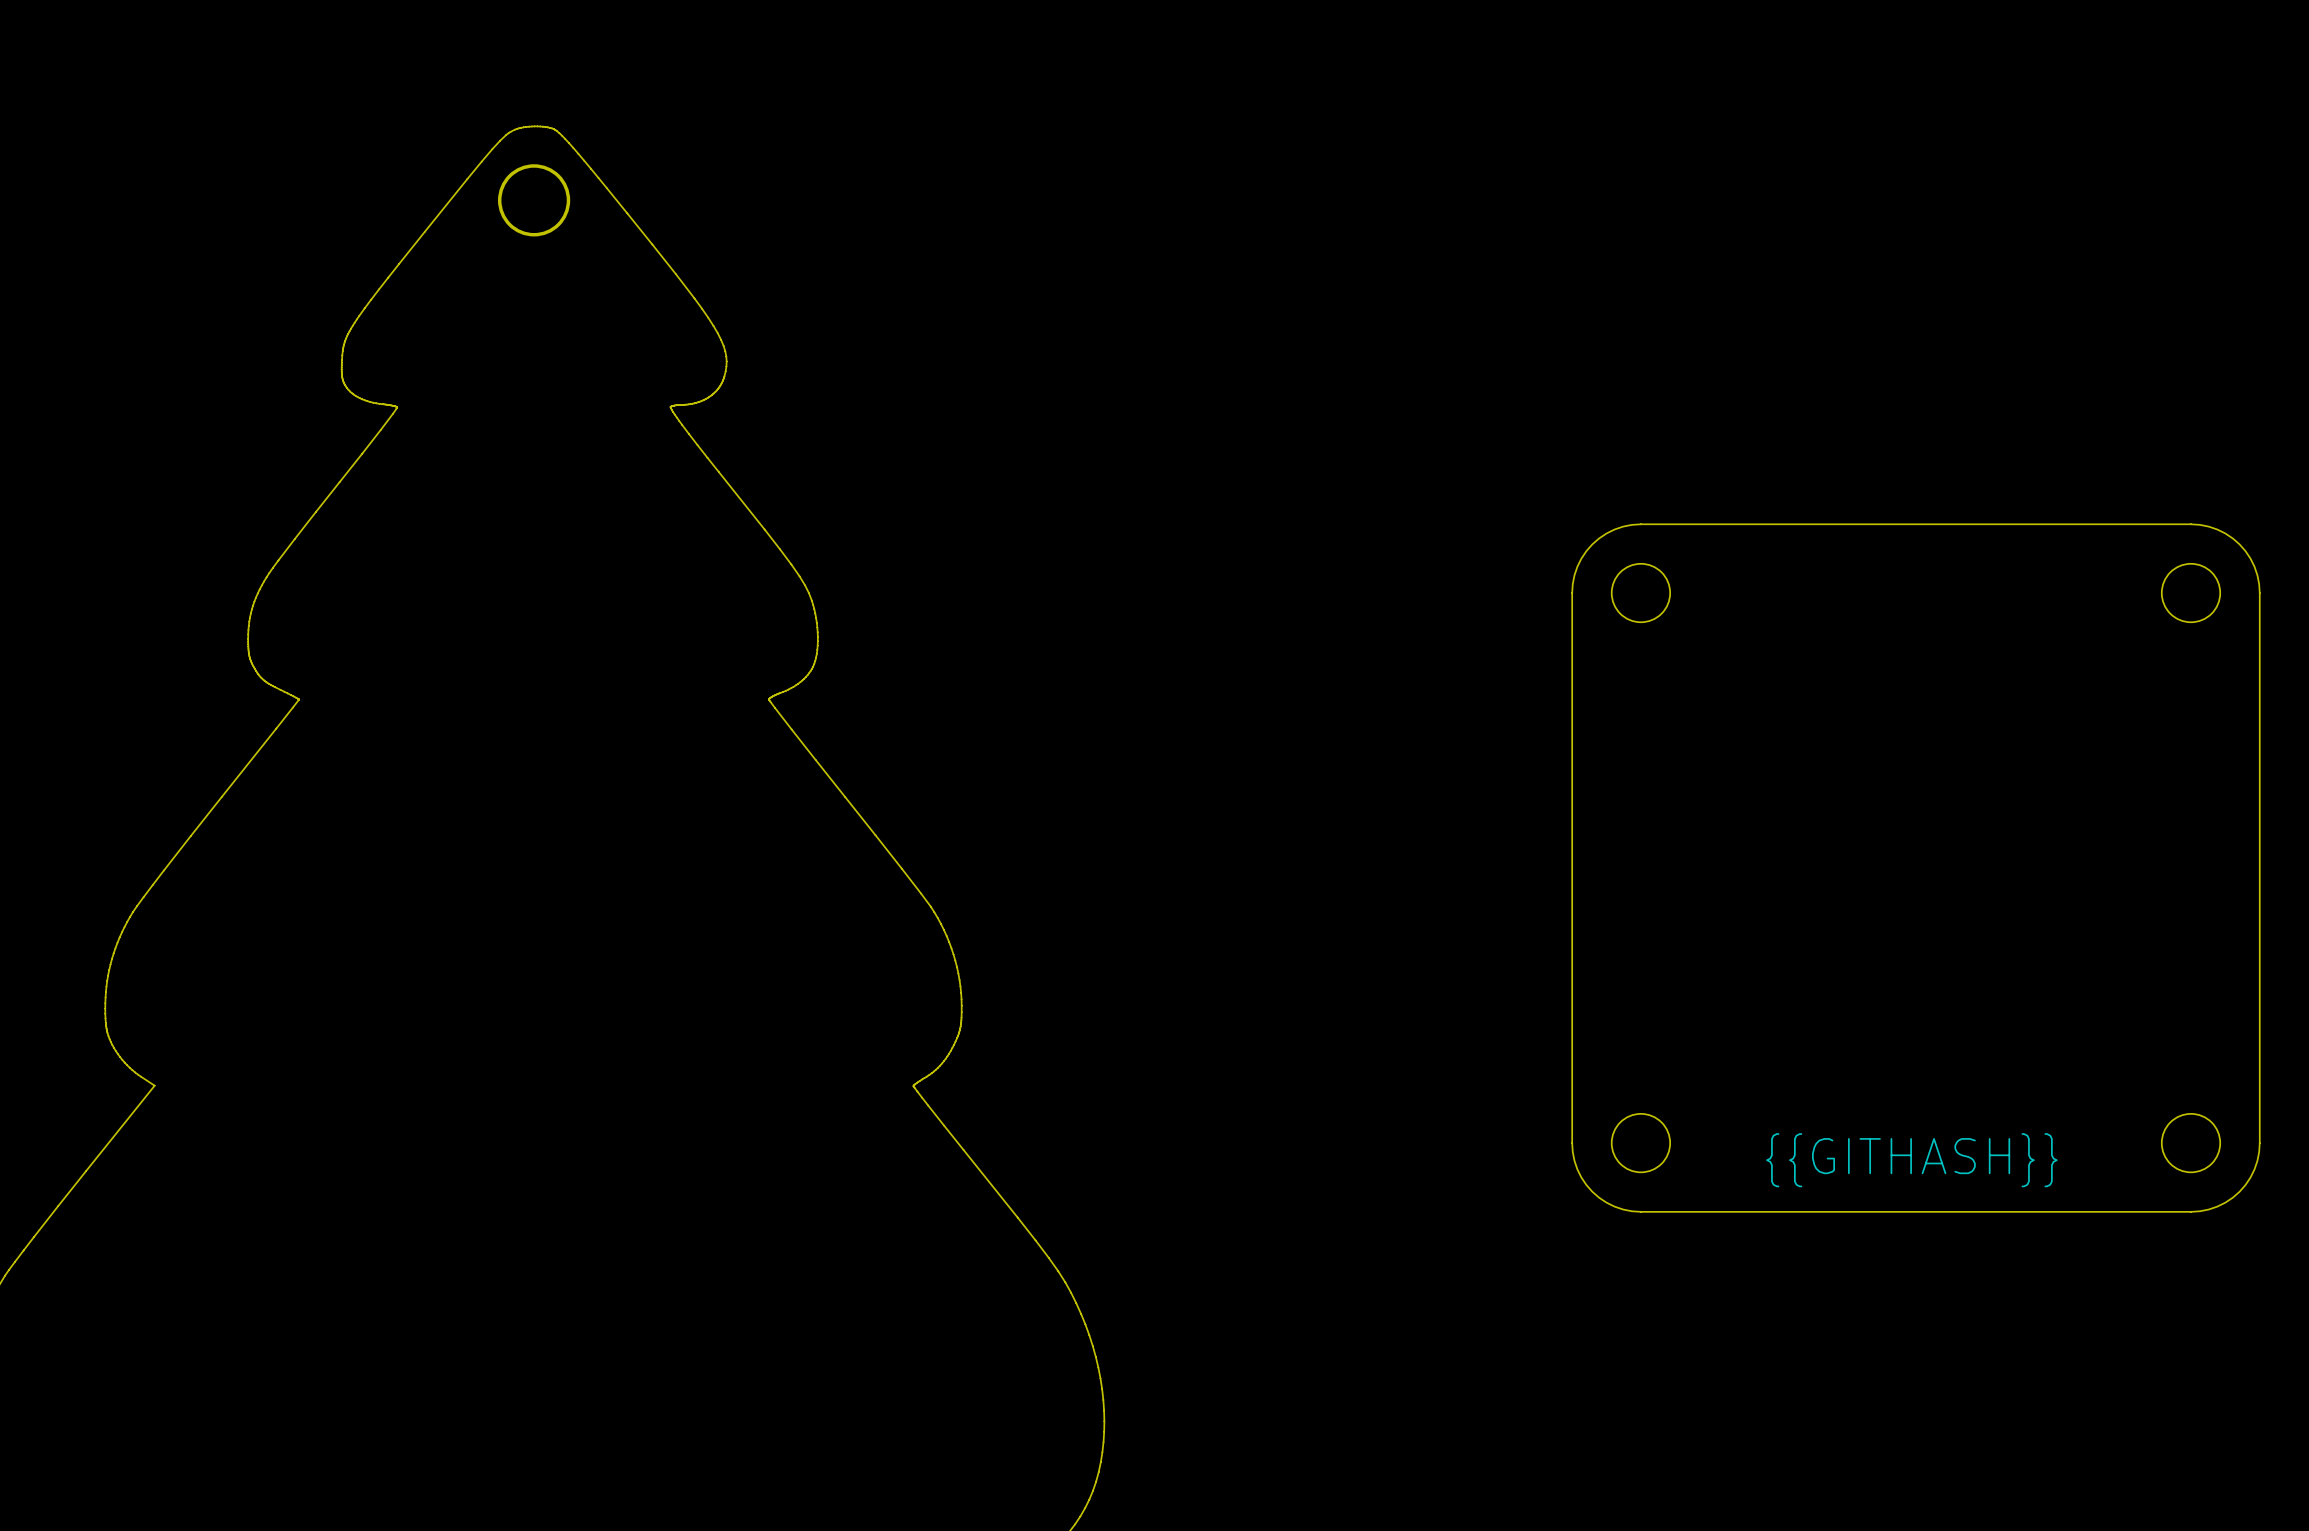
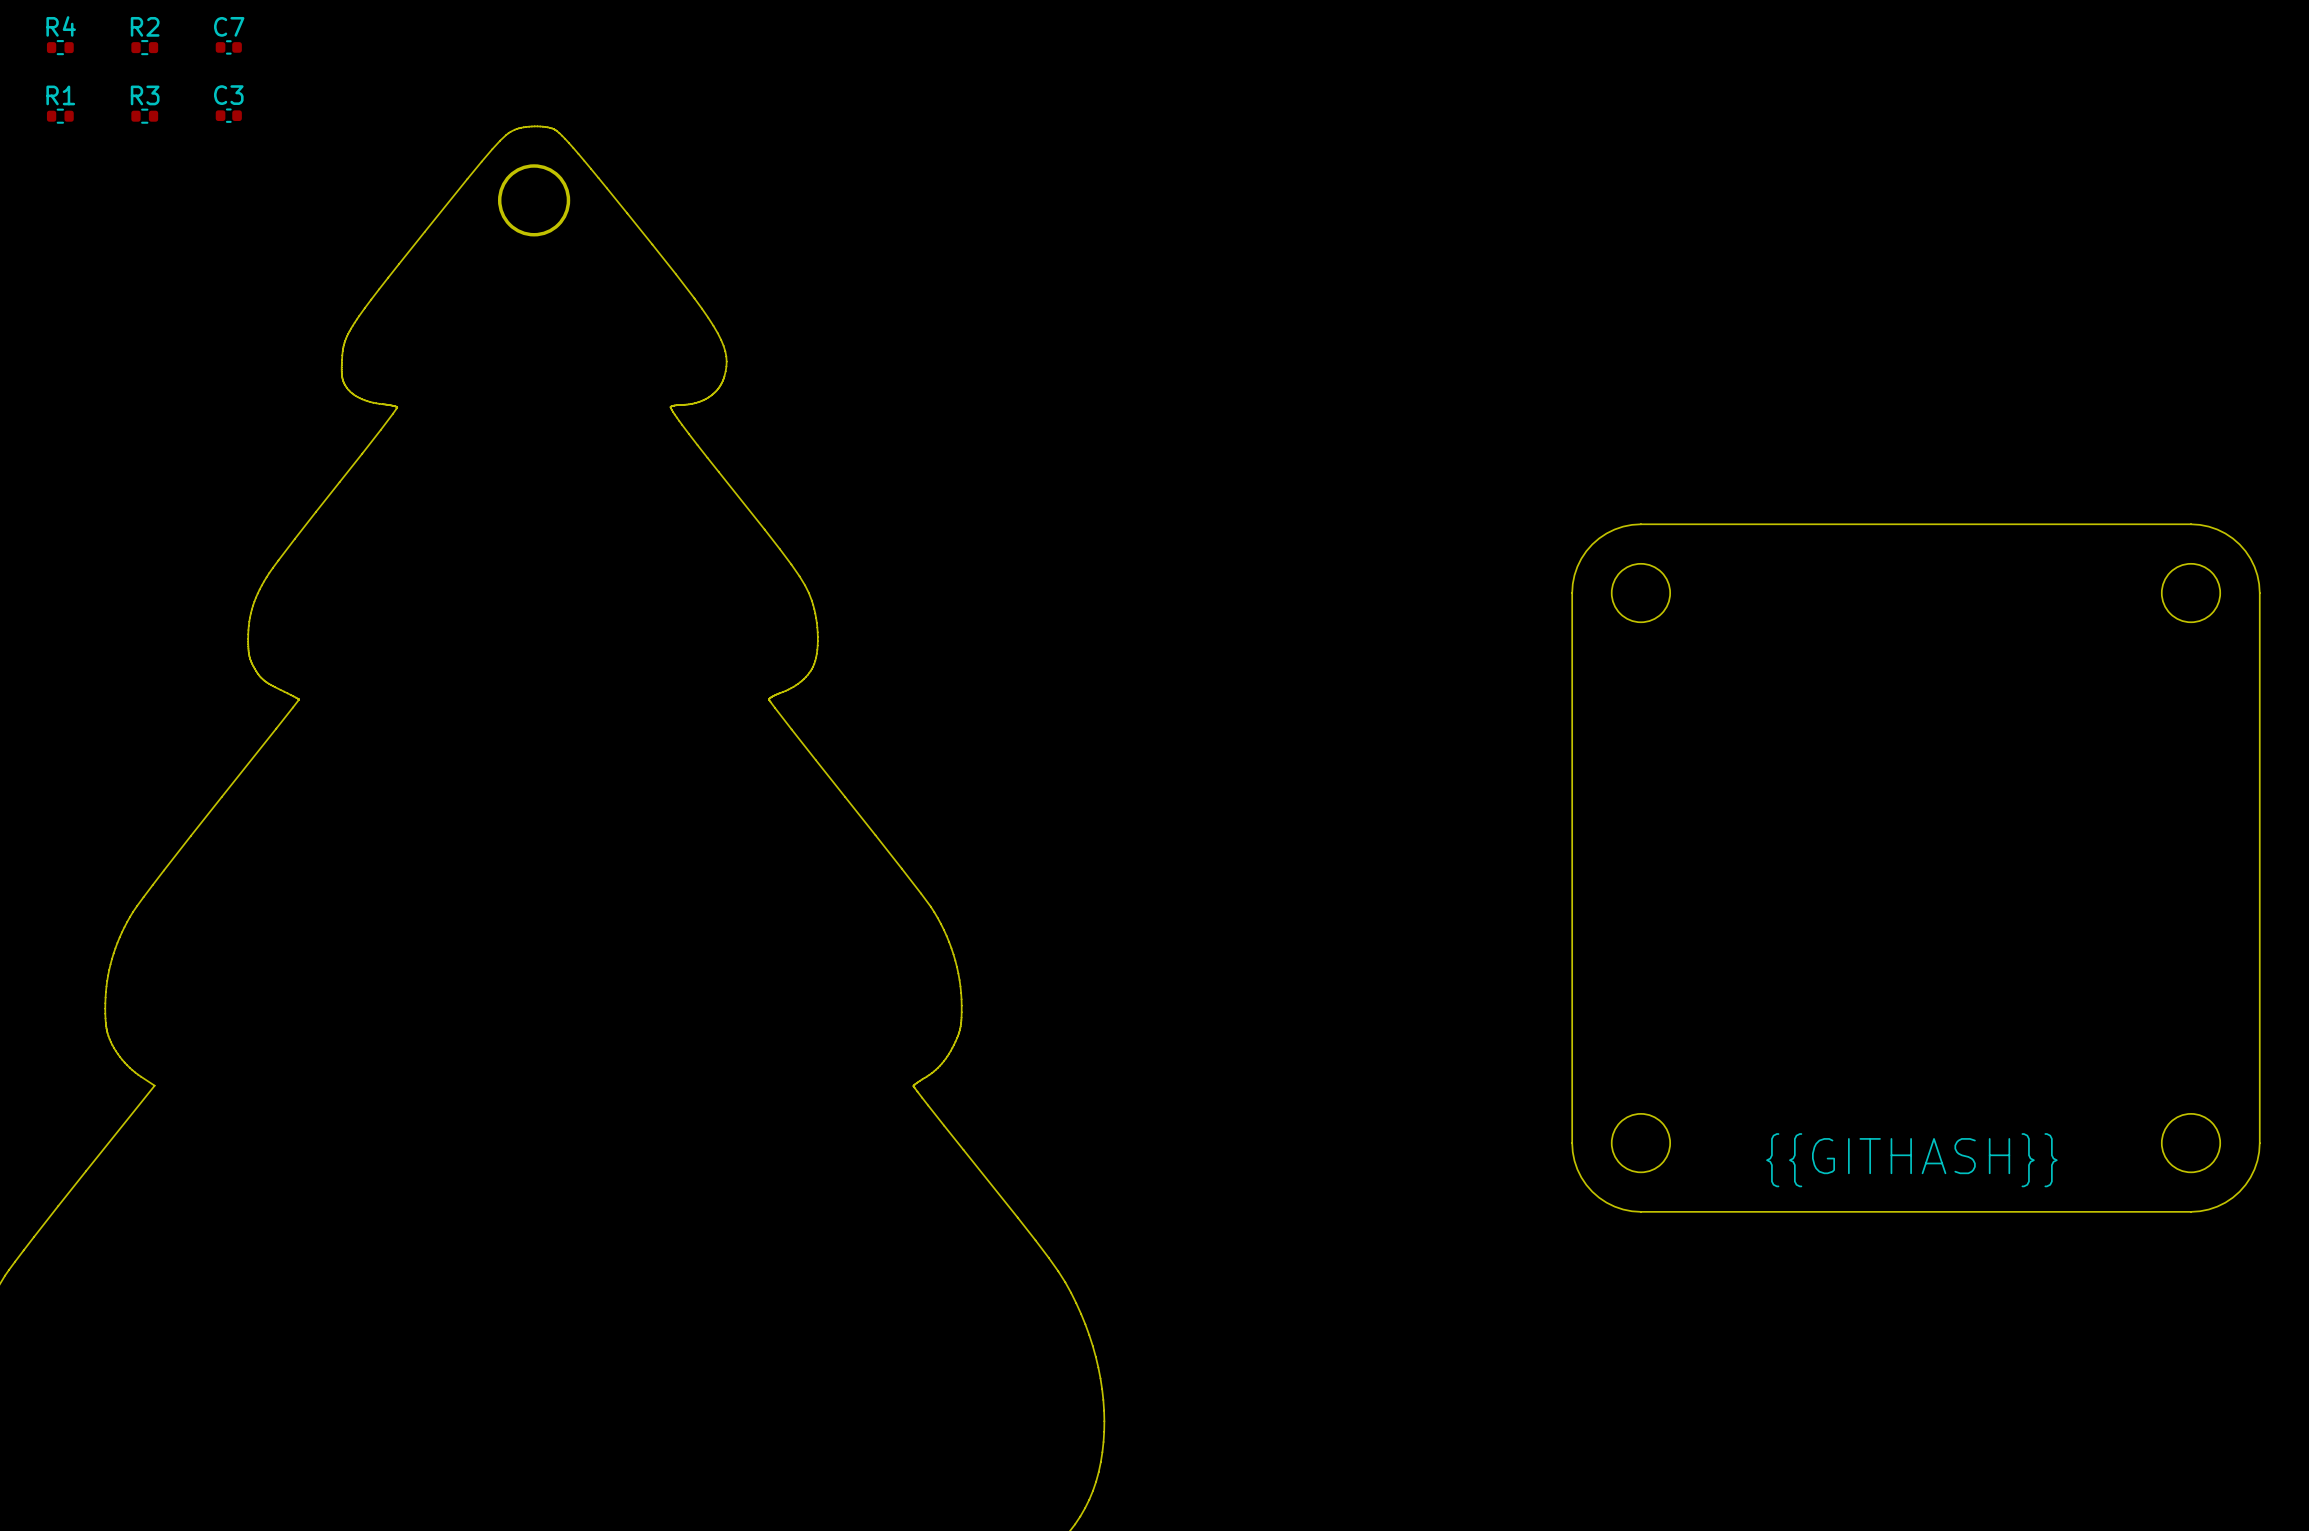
R4: none -> (60, 47)
R2: none -> (144, 47)
C7: none -> (228, 47)
C3: none -> (228, 115)
R1: none -> (60, 116)
R3: none -> (144, 116)

